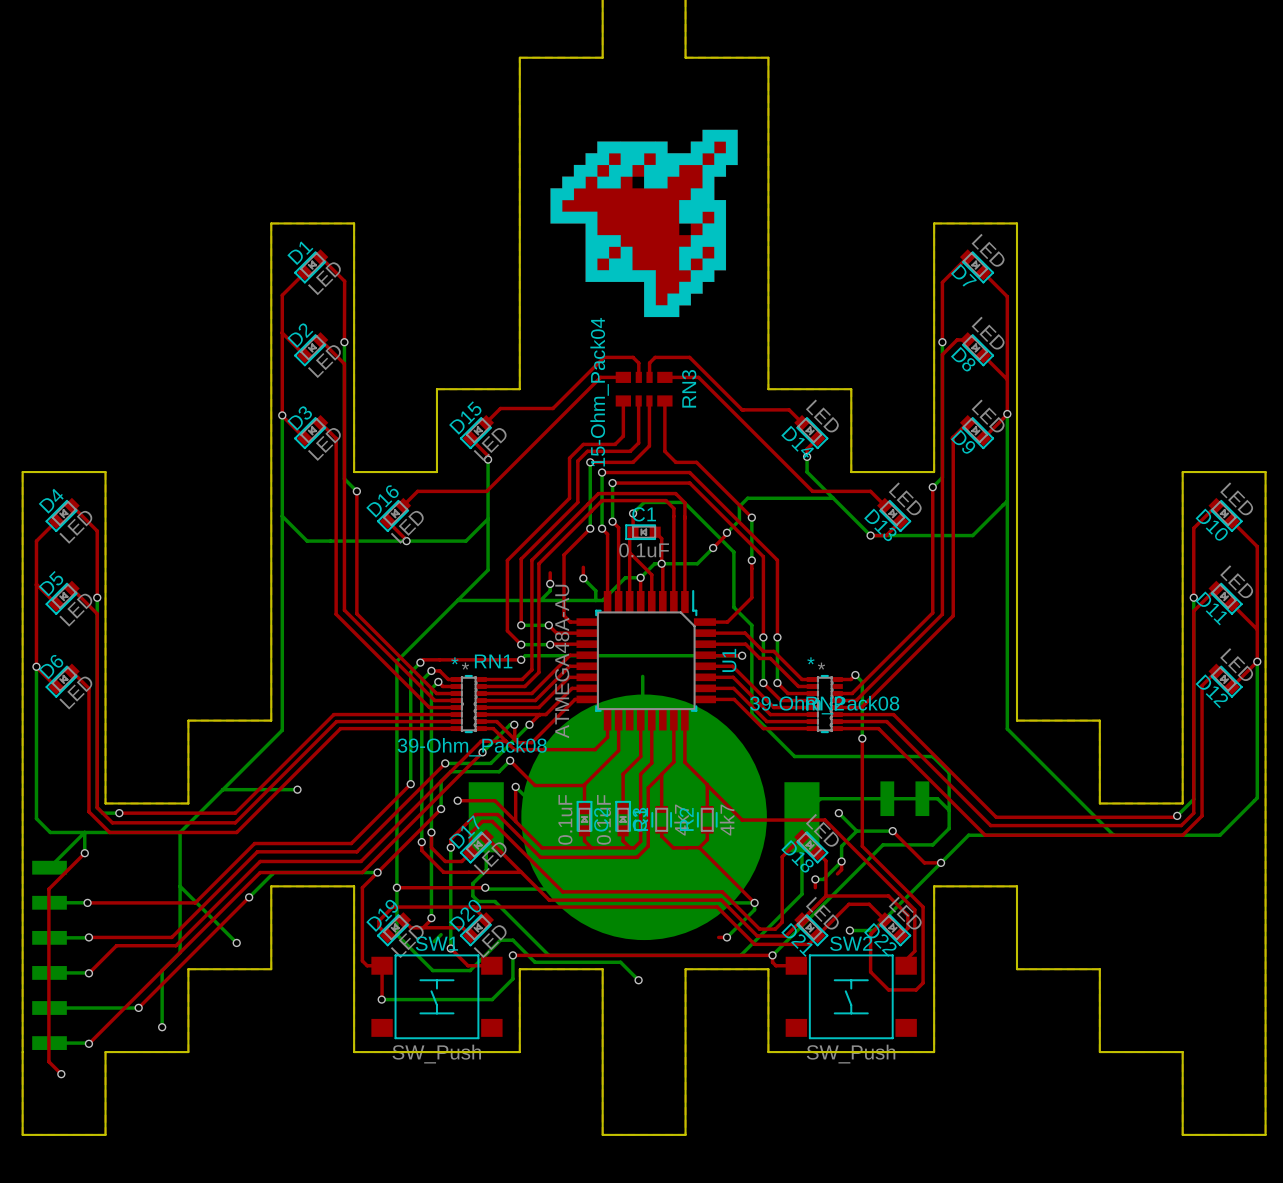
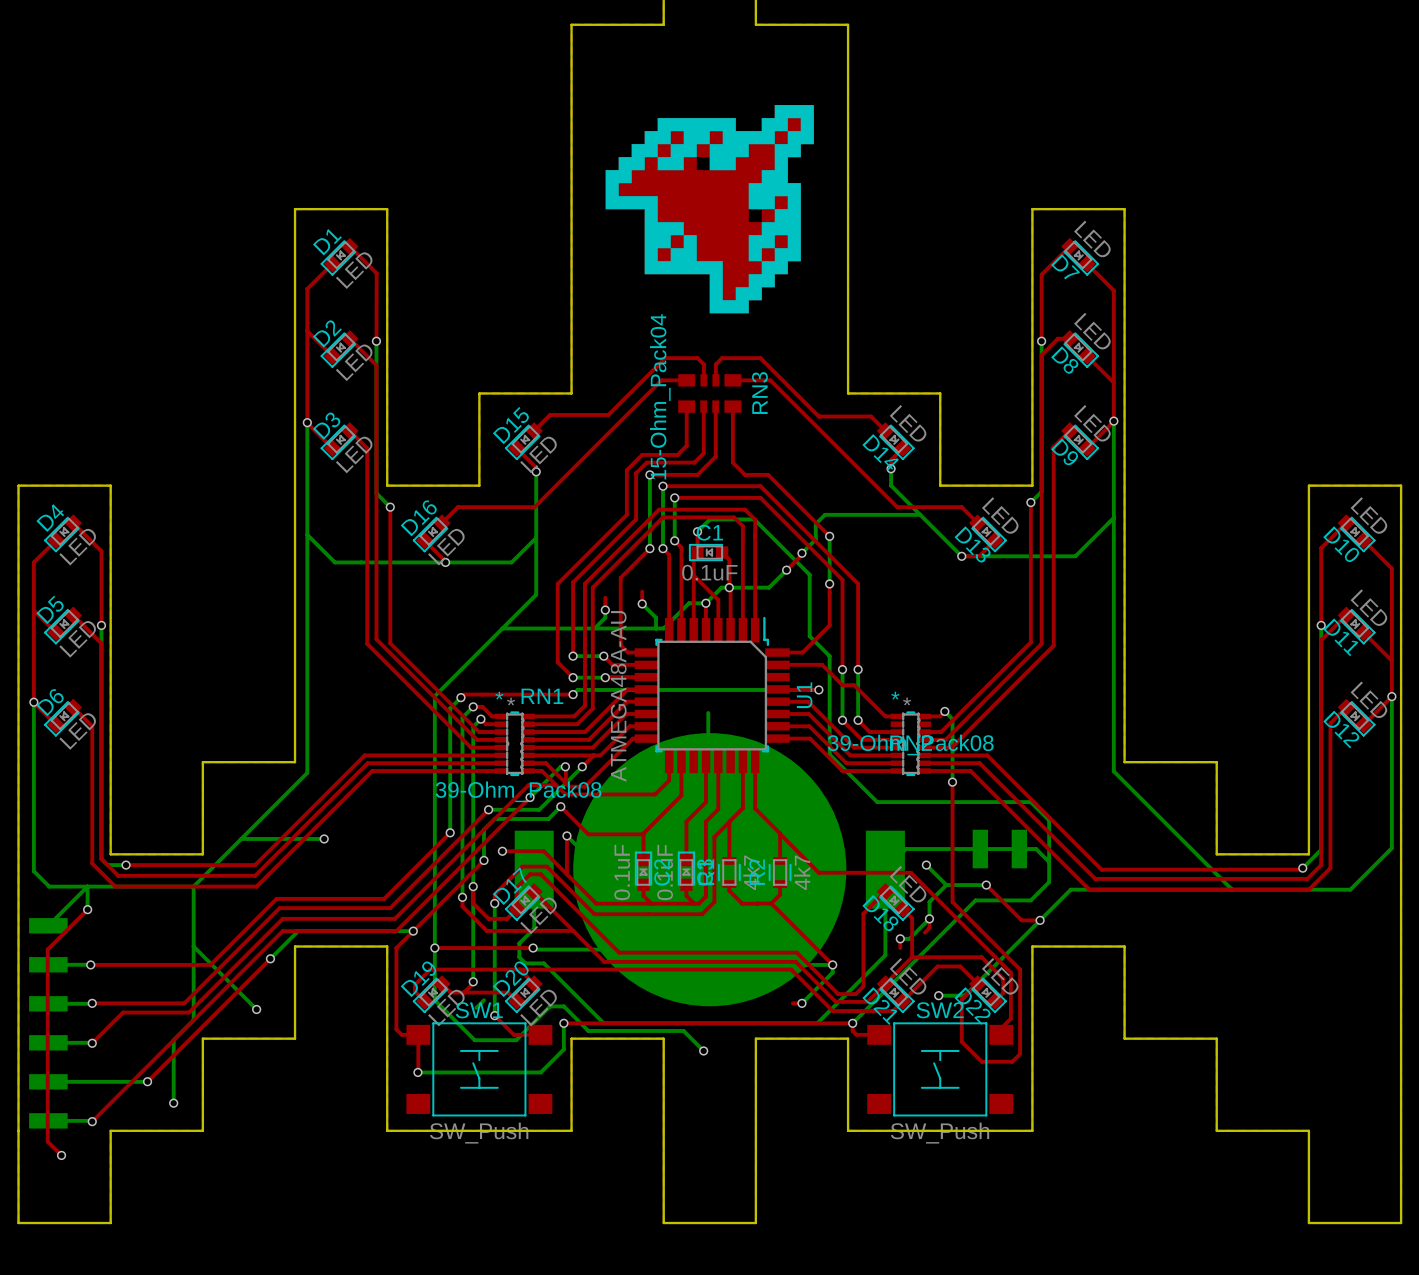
top track: (704, 644) (745, 644) (759, 658) (770, 658) (798, 686) (811, 686) -> none

